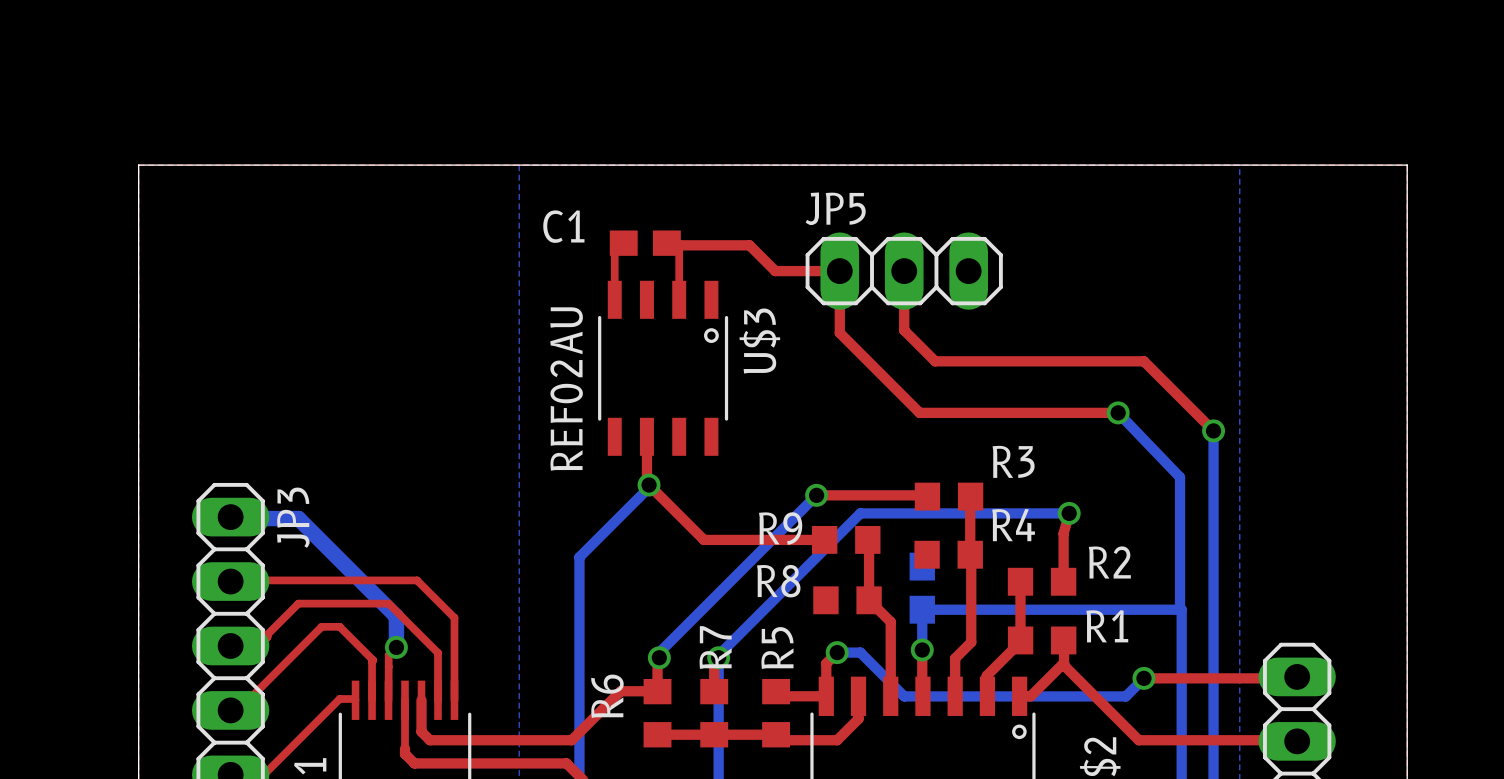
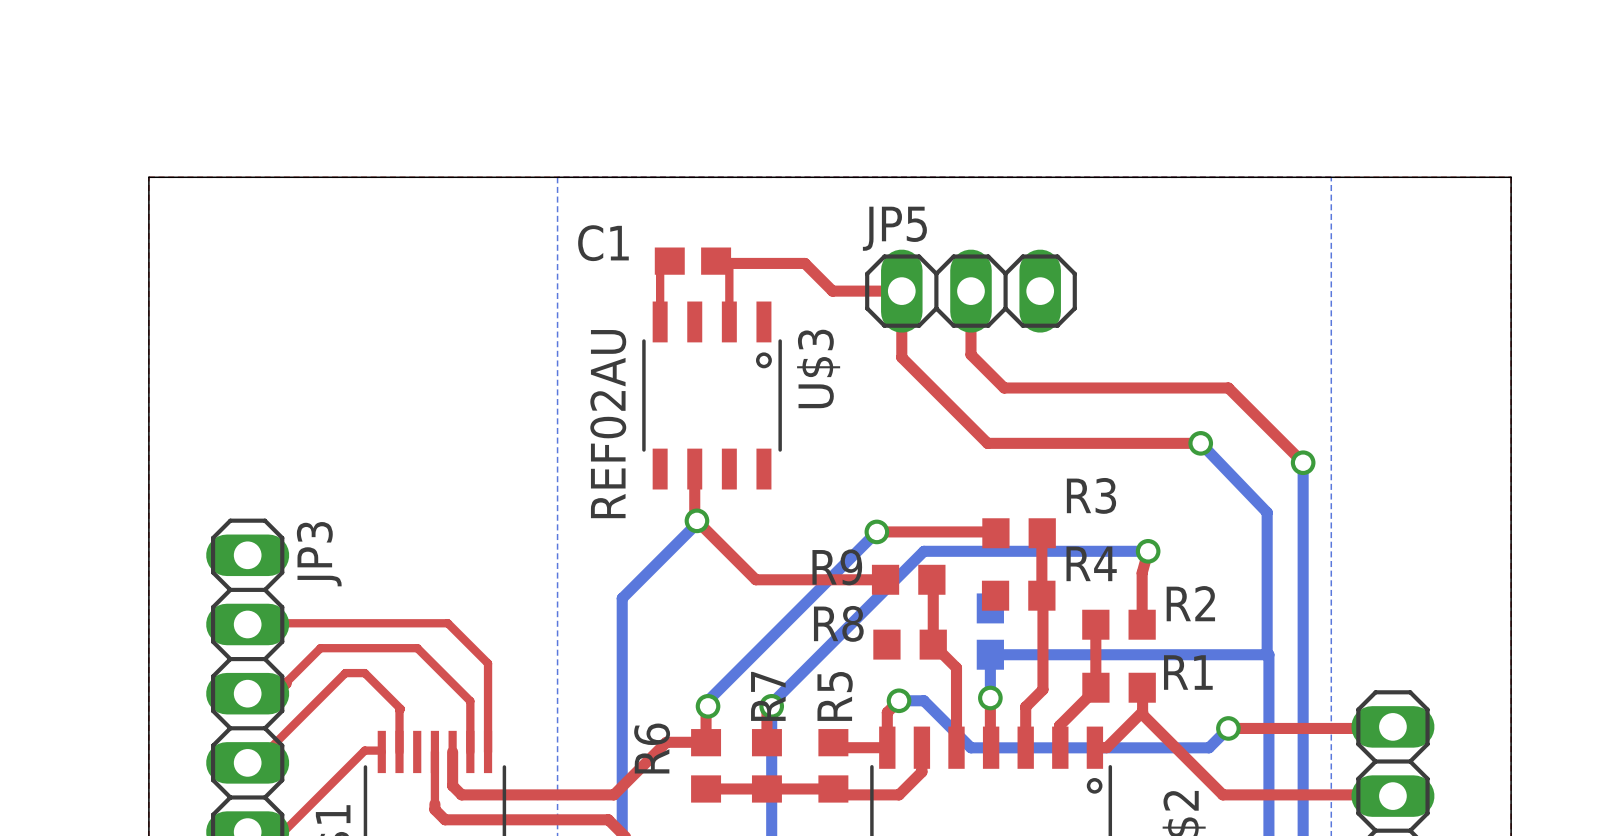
bottom track: (230, 517) (298, 518) (396, 616) (396, 647) -> none
top track: (396, 647) (388, 655) (388, 700) -> none
via: (396, 647) -> none

